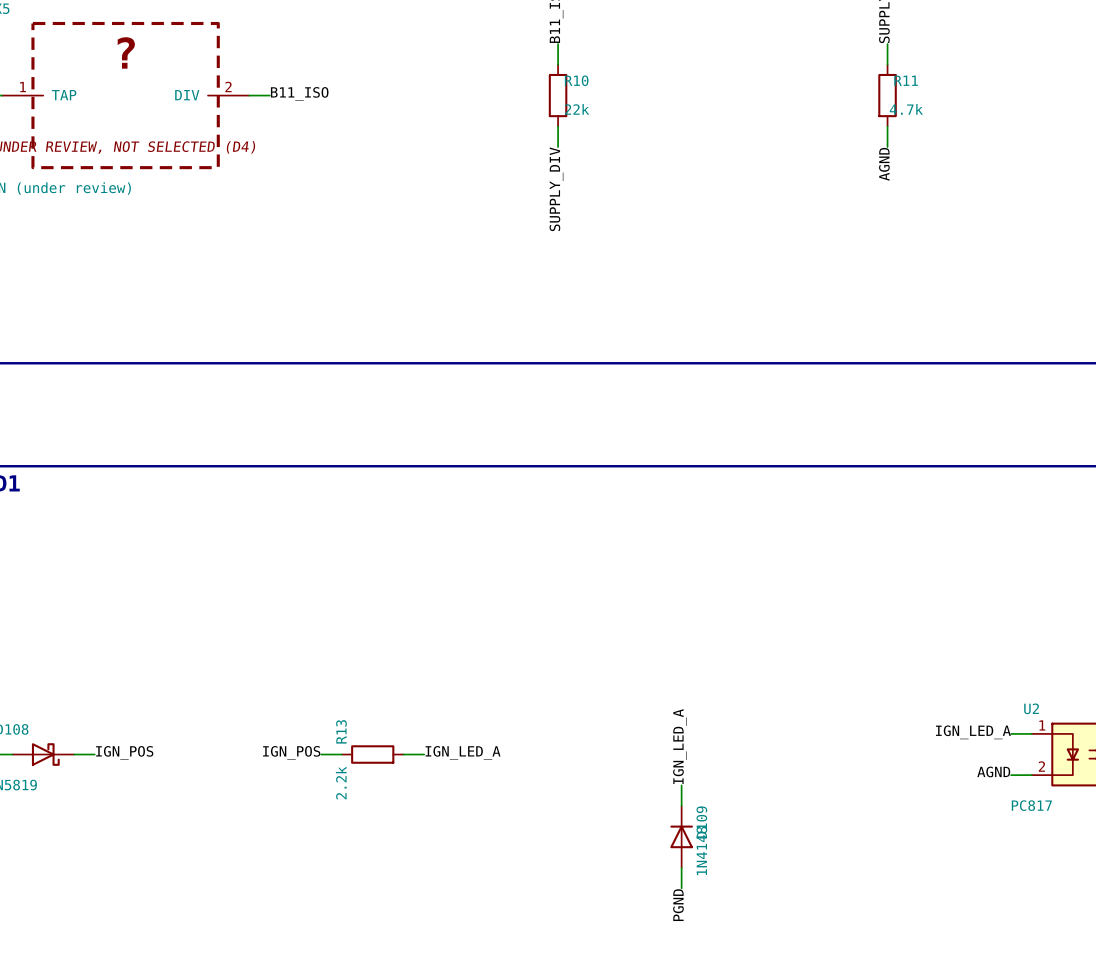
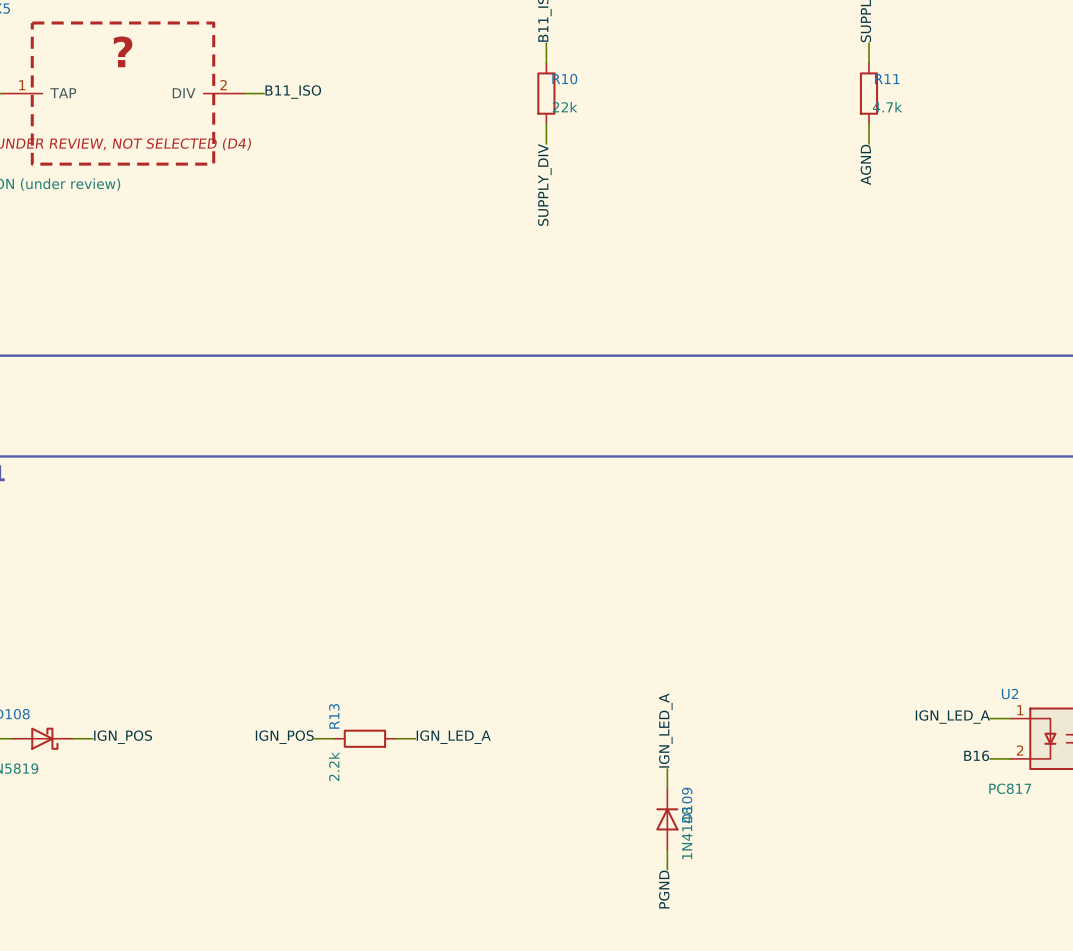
label: AGND (993, 771) -> B16 (976, 755)

